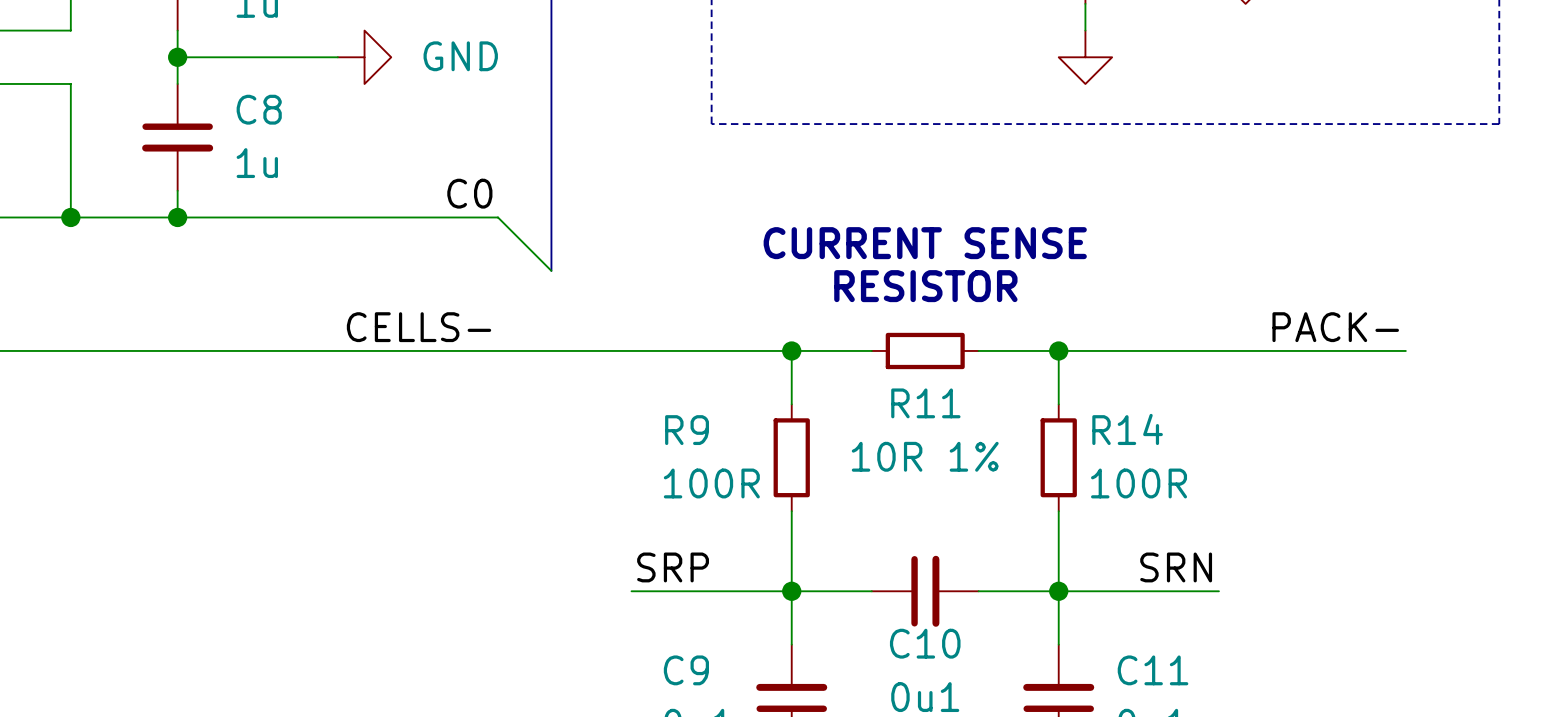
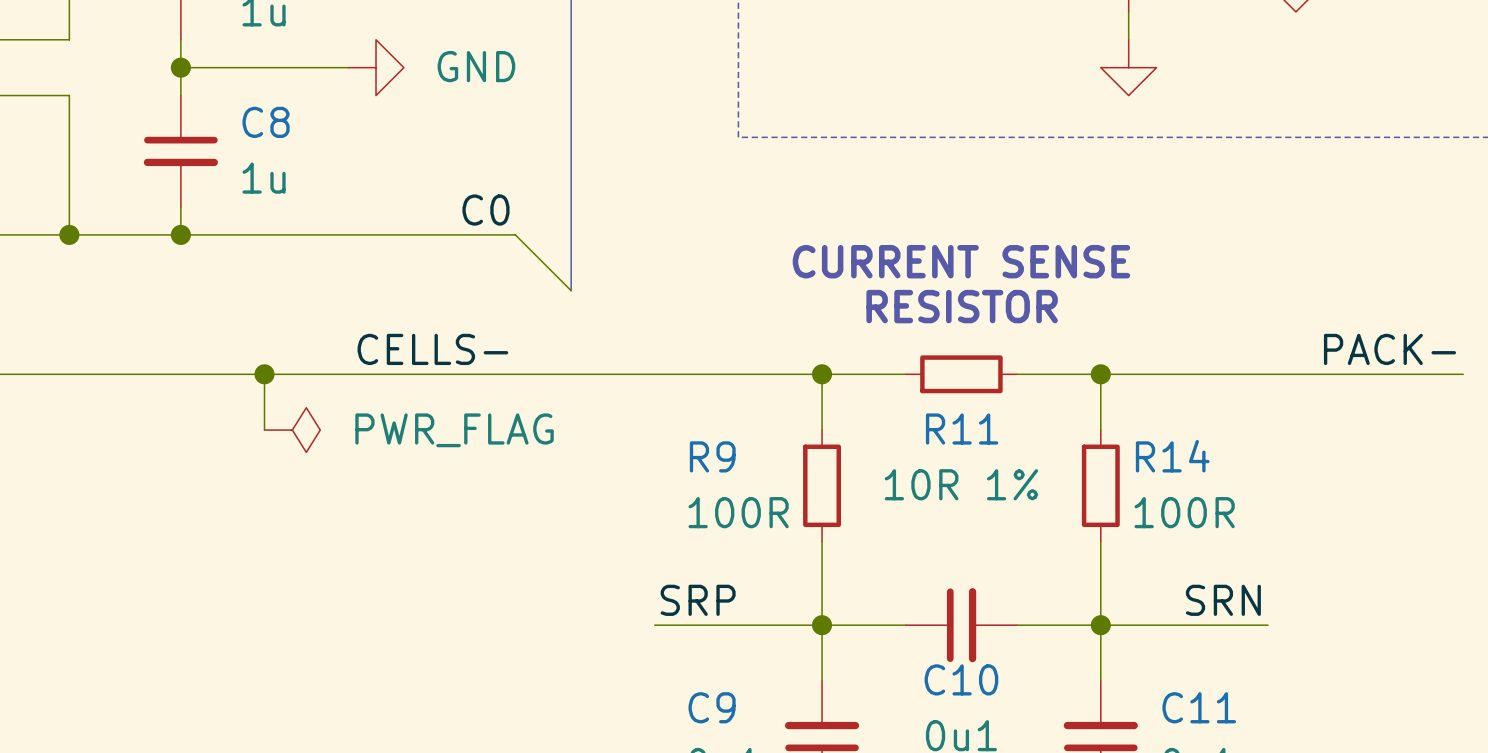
wire: none -> (264, 374) (264, 430)
junction: none -> (264, 374)
power symbol: none -> PWR_FLAG (292, 430)

